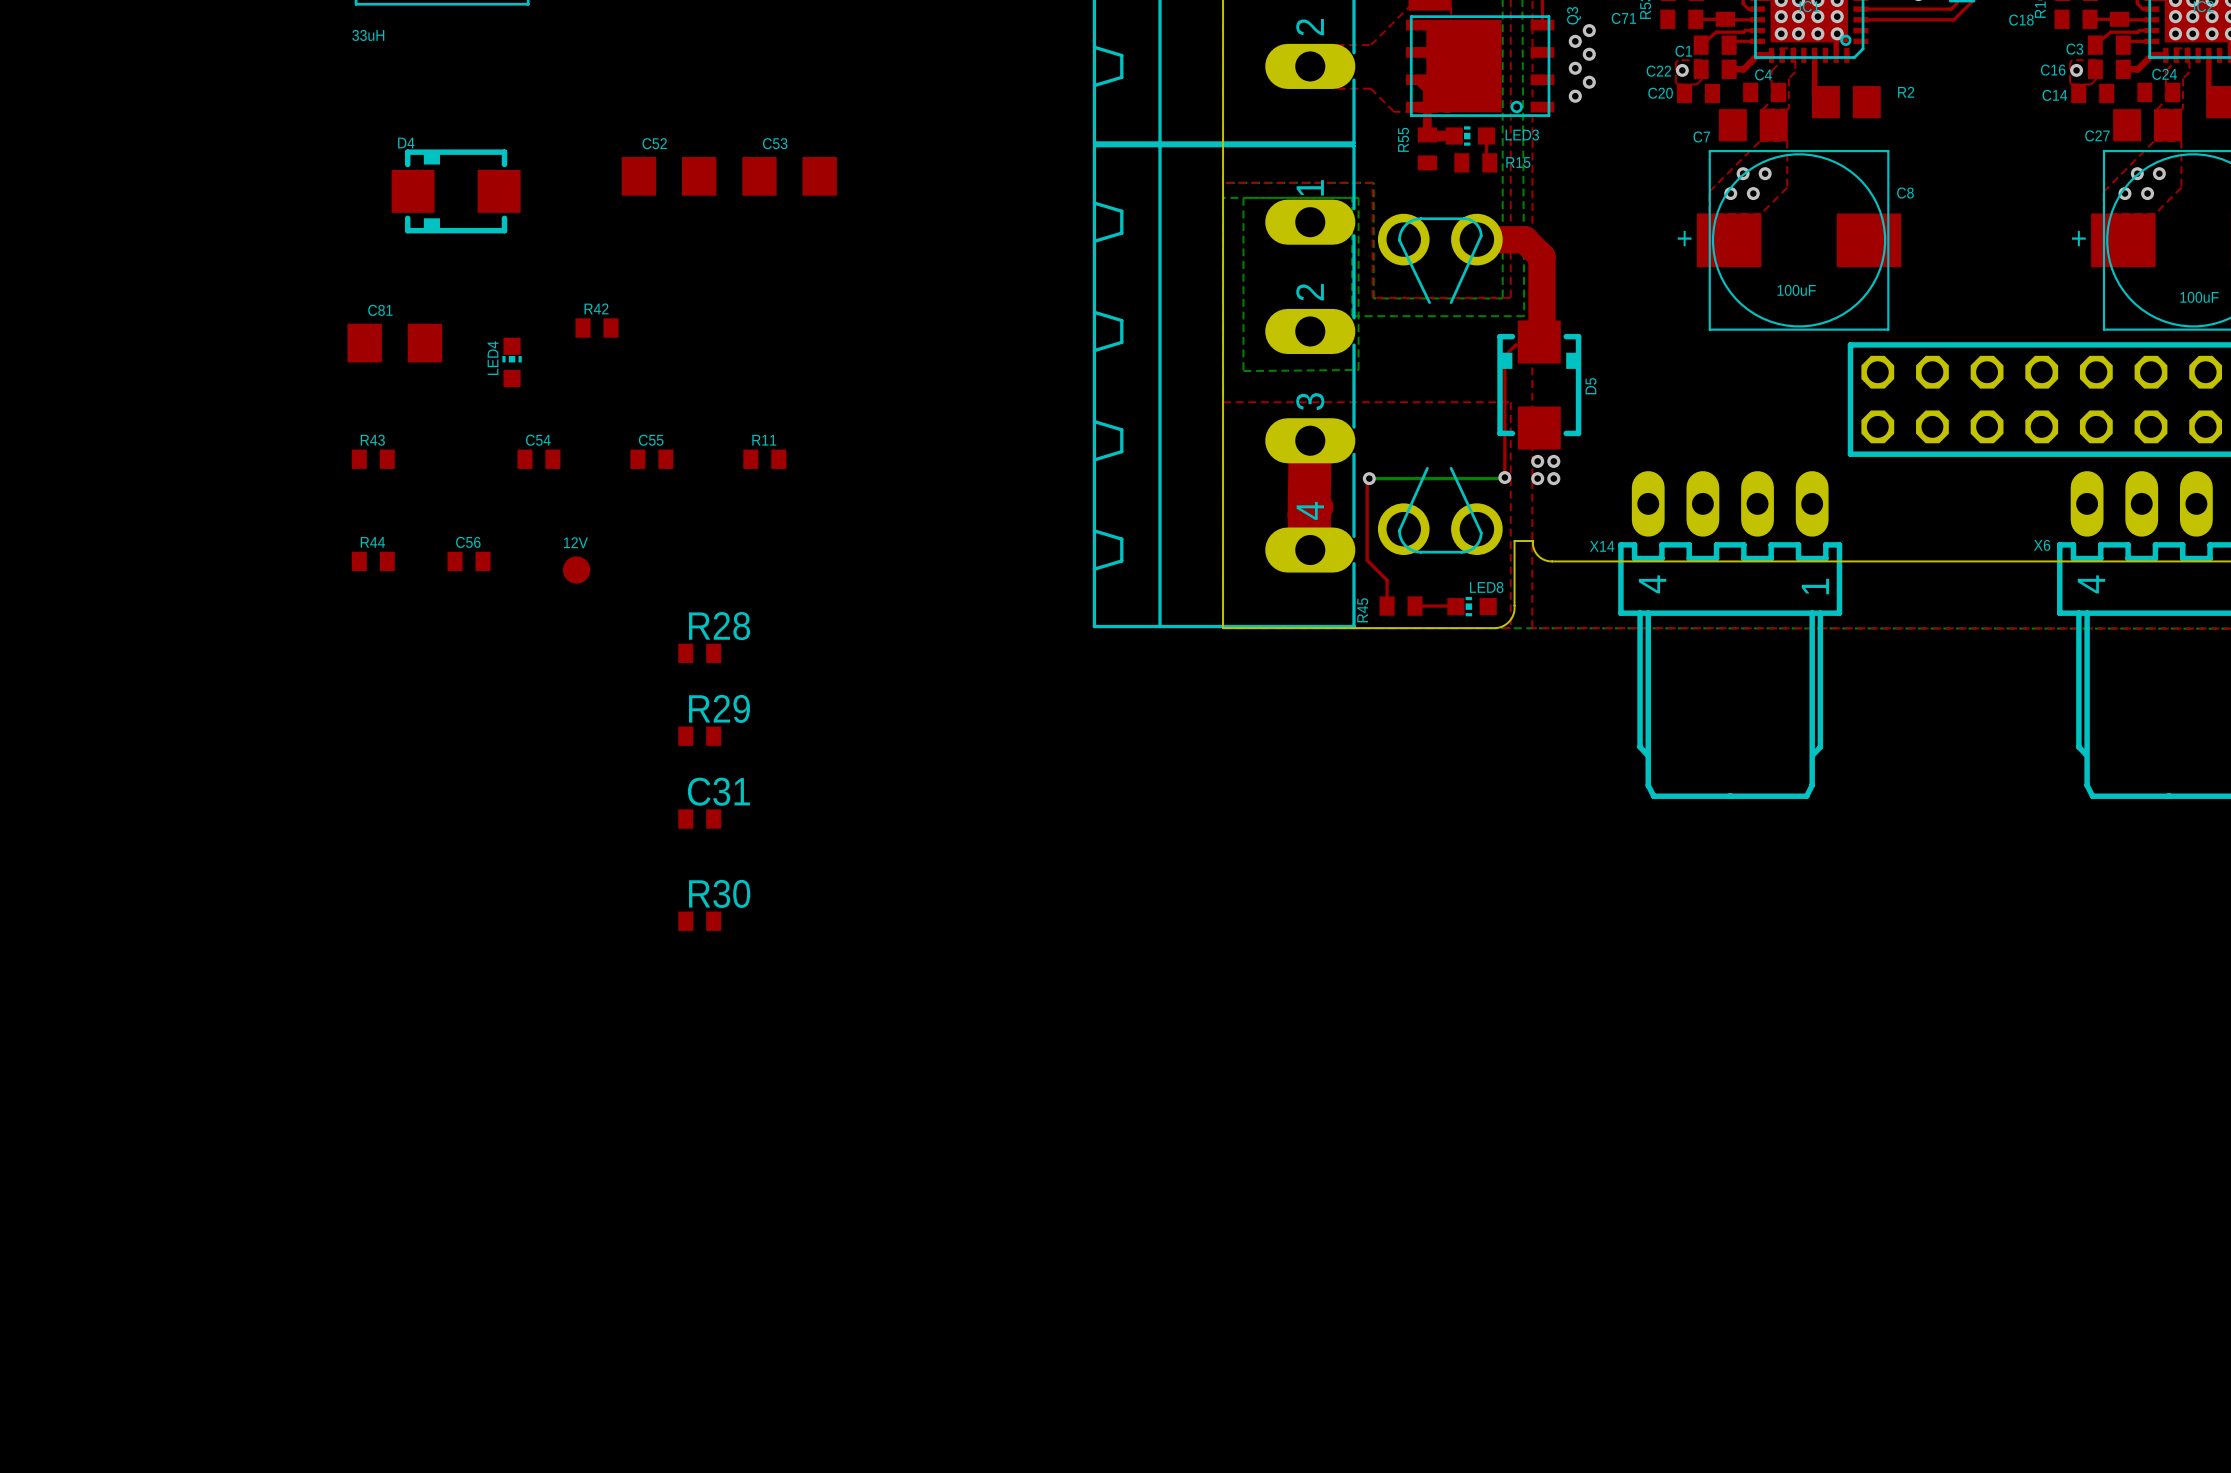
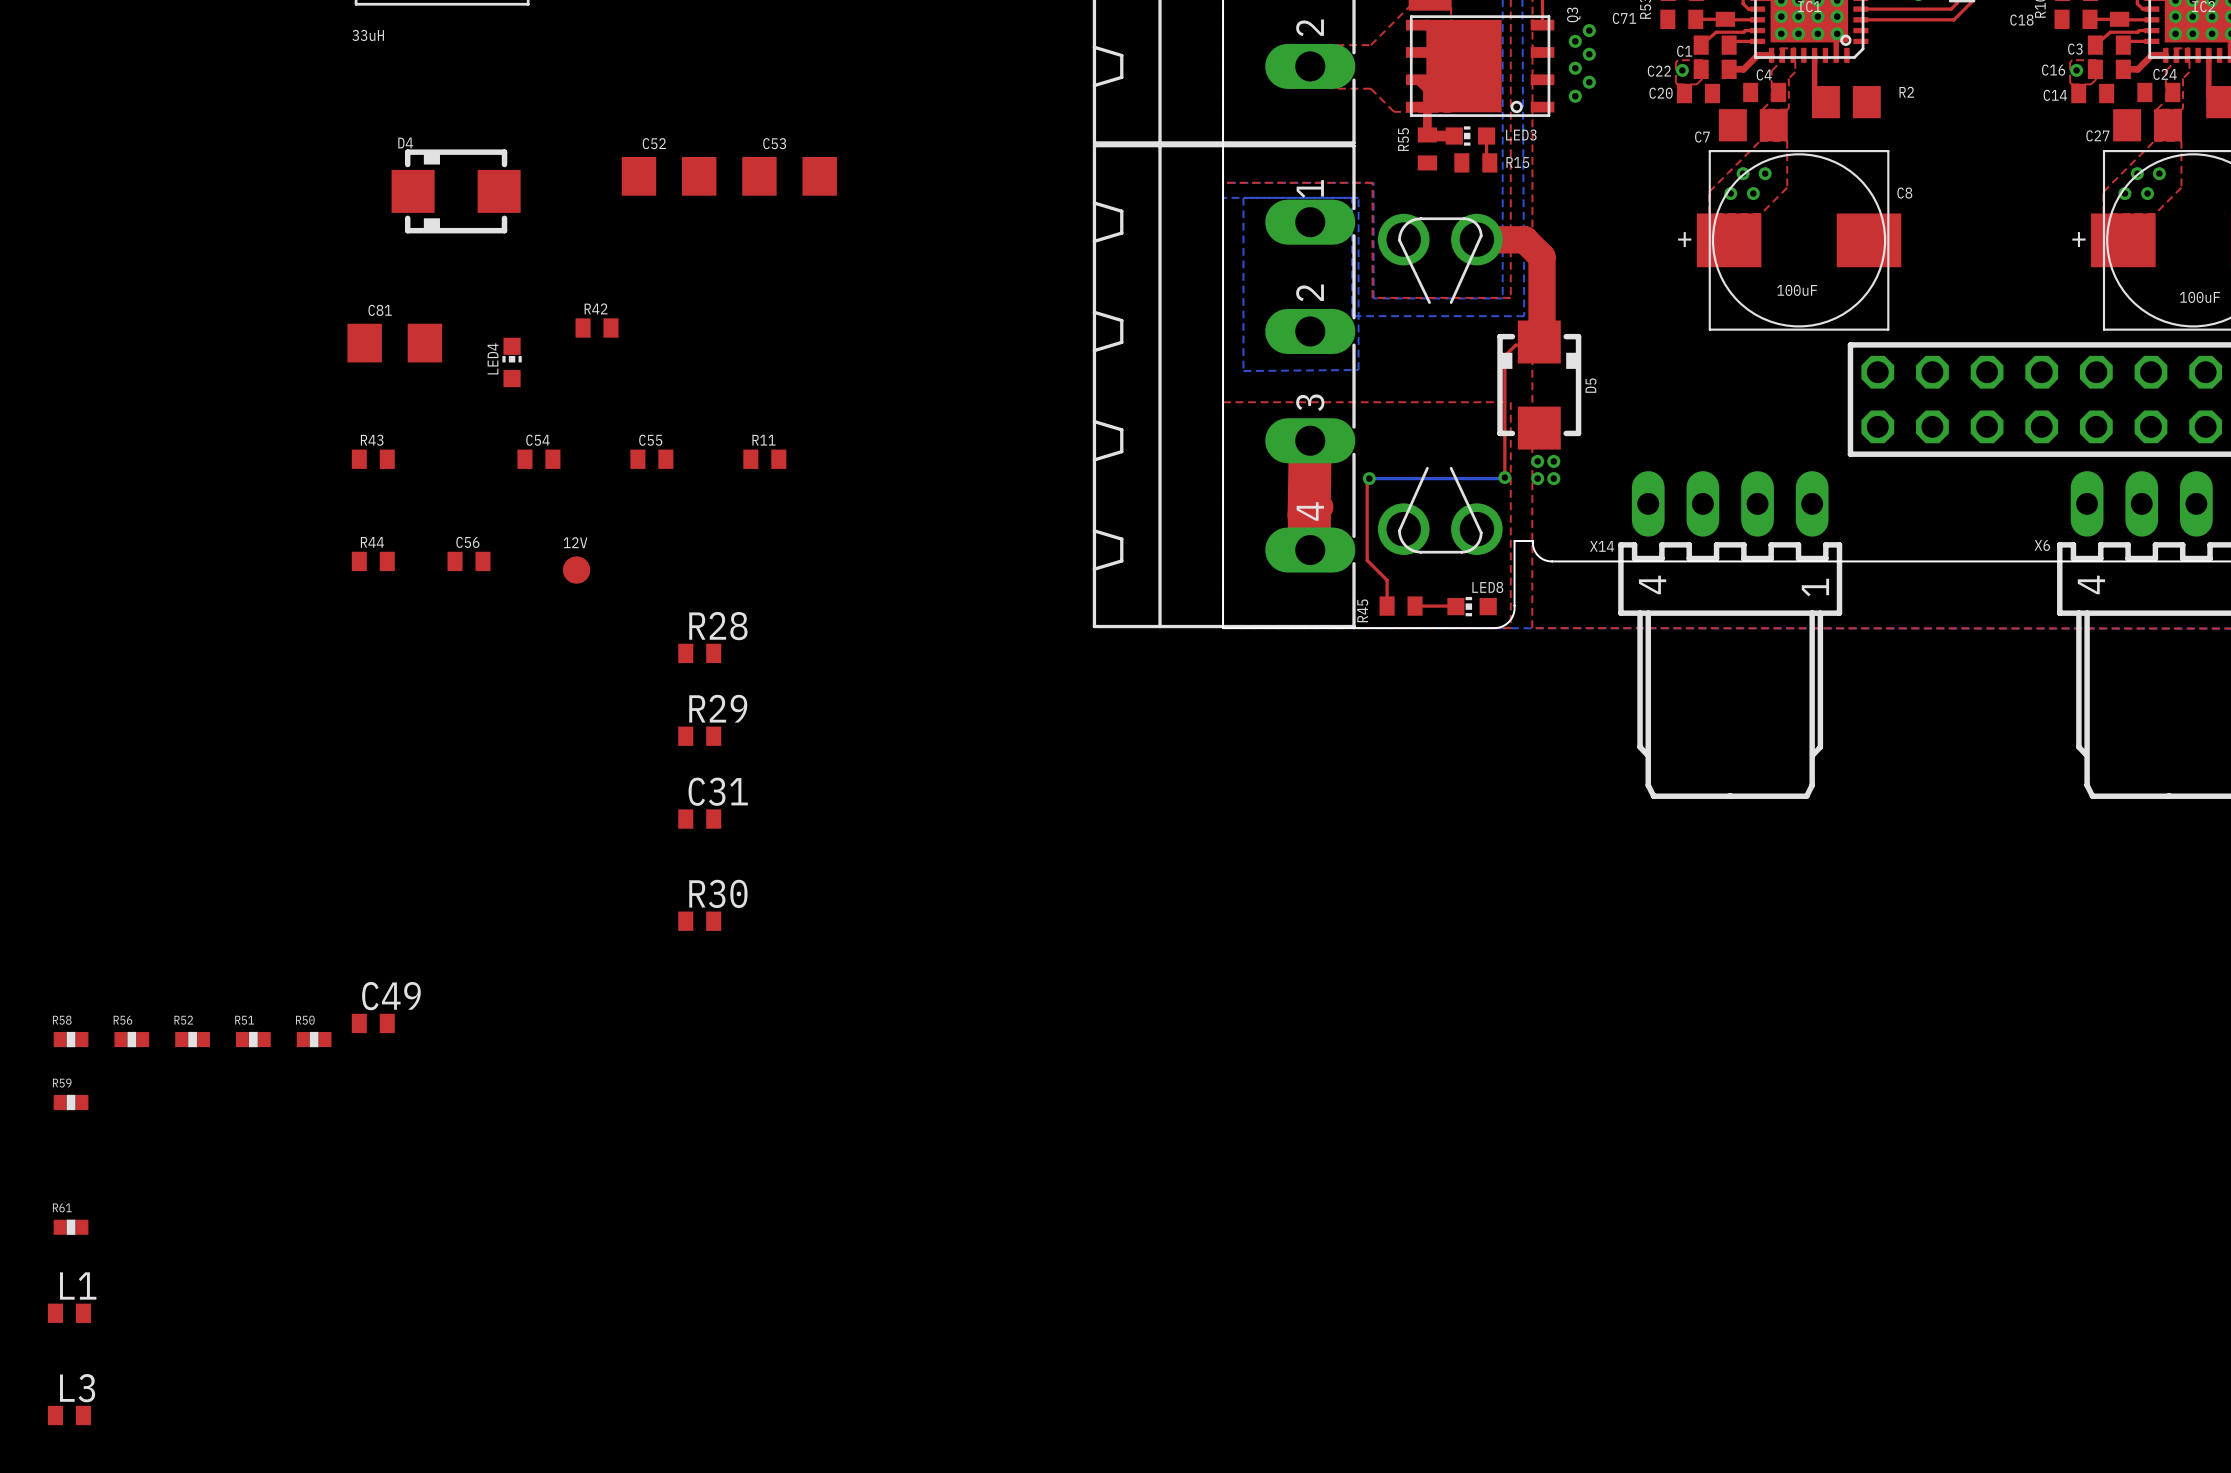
C49: none -> (373, 1023)
R58: none -> (71, 1039)
R56: none -> (131, 1039)
R52: none -> (192, 1039)
R51: none -> (253, 1039)
R50: none -> (314, 1039)
R59: none -> (71, 1102)
R61: none -> (71, 1227)
L1: none -> (69, 1313)
L3: none -> (69, 1415)

